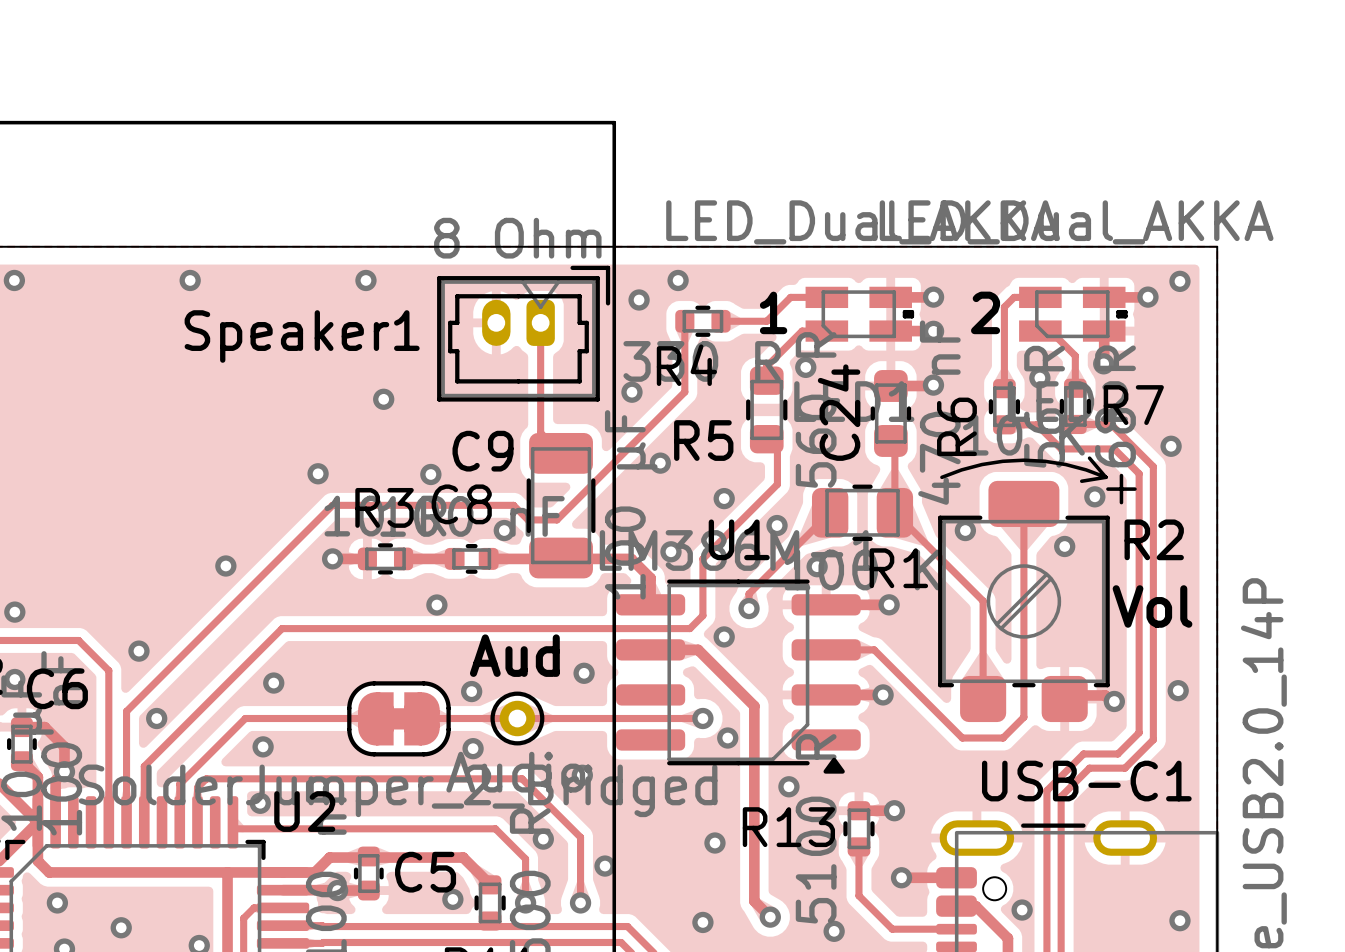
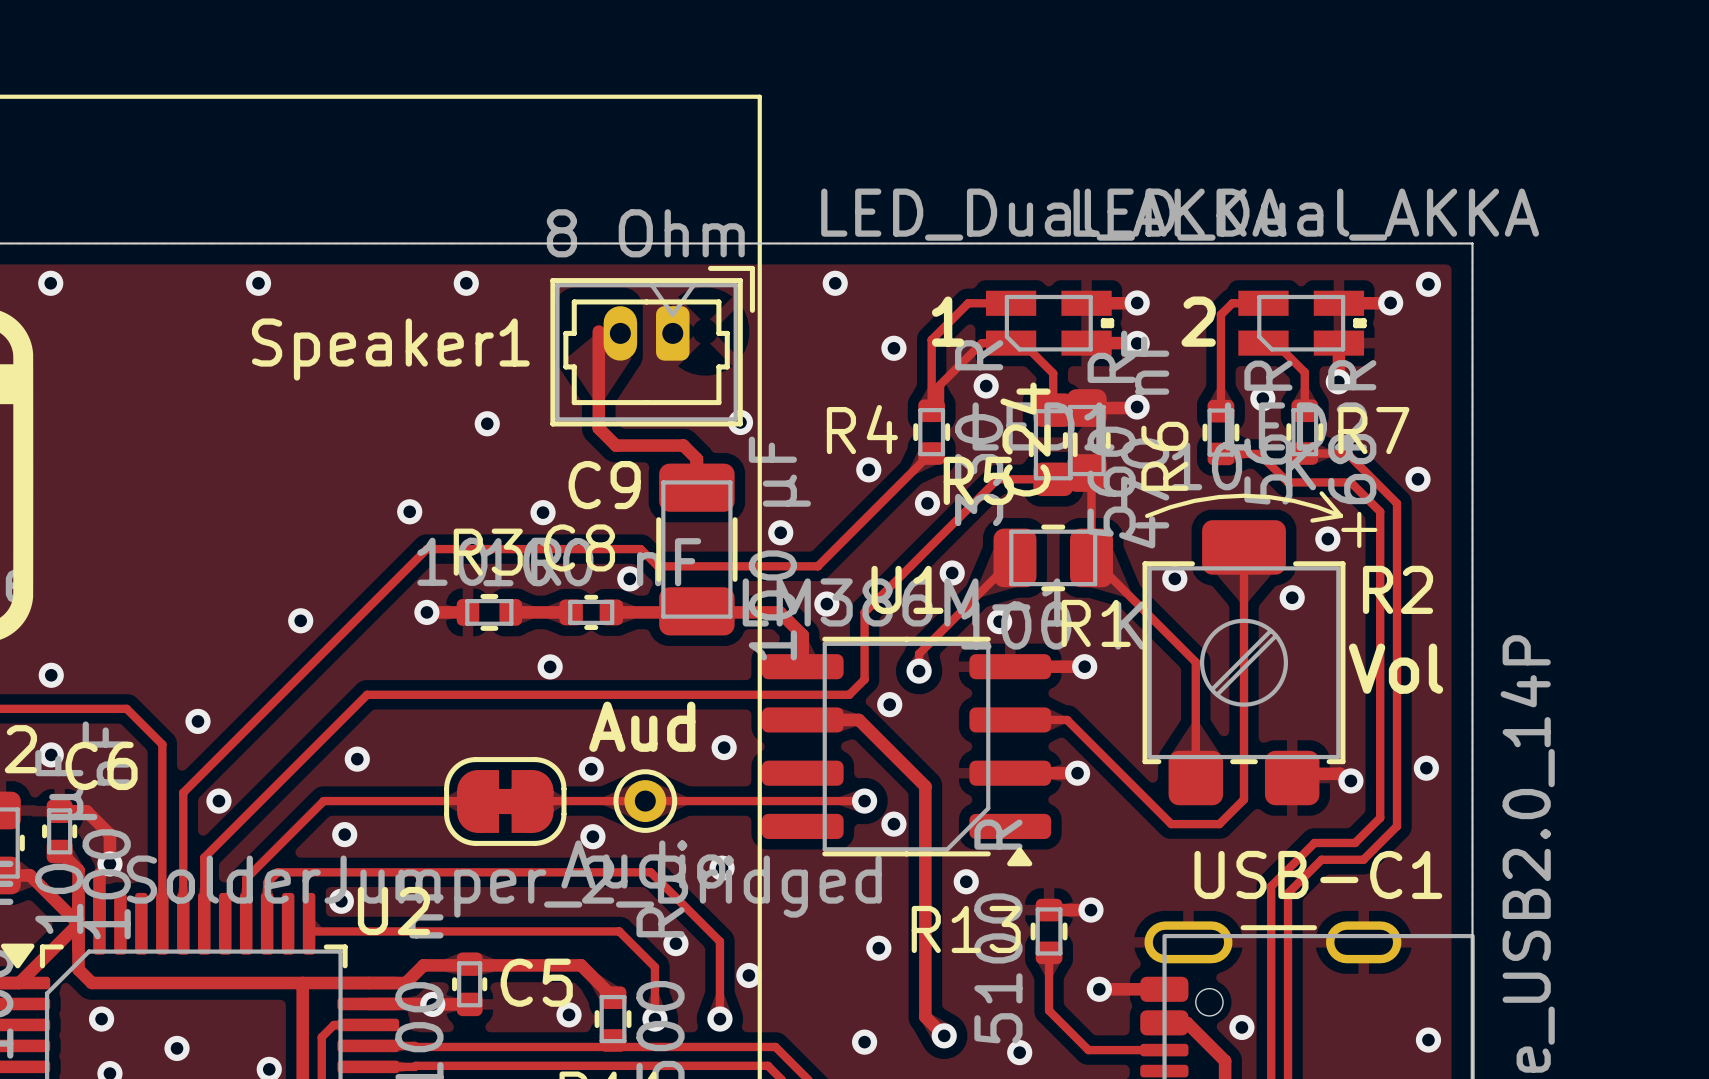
via: (639, 299) -> none
track: (684, 321) (684, 392) (556, 519) -> (930, 453) (817, 566) (692, 566)
R4 rotation: 0° (702, 321) -> 90° clockwise (931, 432)
R4 position: (702, 321) -> (931, 432)
track: (721, 321) (766, 321) -> (931, 410) (931, 339) (940, 331)
track: (540, 322) (540, 432) (561, 453) -> (598, 331) (598, 428) (615, 445) (683, 445) (696, 458) (696, 487)
track: none -> (1020, 340) (1053, 373) (1053, 410)
via: none -> (893, 348)
via position: (631, 392) -> (740, 422)
R5 position: (766, 409) -> (1053, 444)
via: none -> (868, 469)
track: (766, 439) (777, 449) (777, 484) -> (1053, 479) (997, 479) (952, 524)
via: (660, 463) -> none
via: none -> (927, 503)
via: none -> (780, 532)
via: (724, 498) -> none

